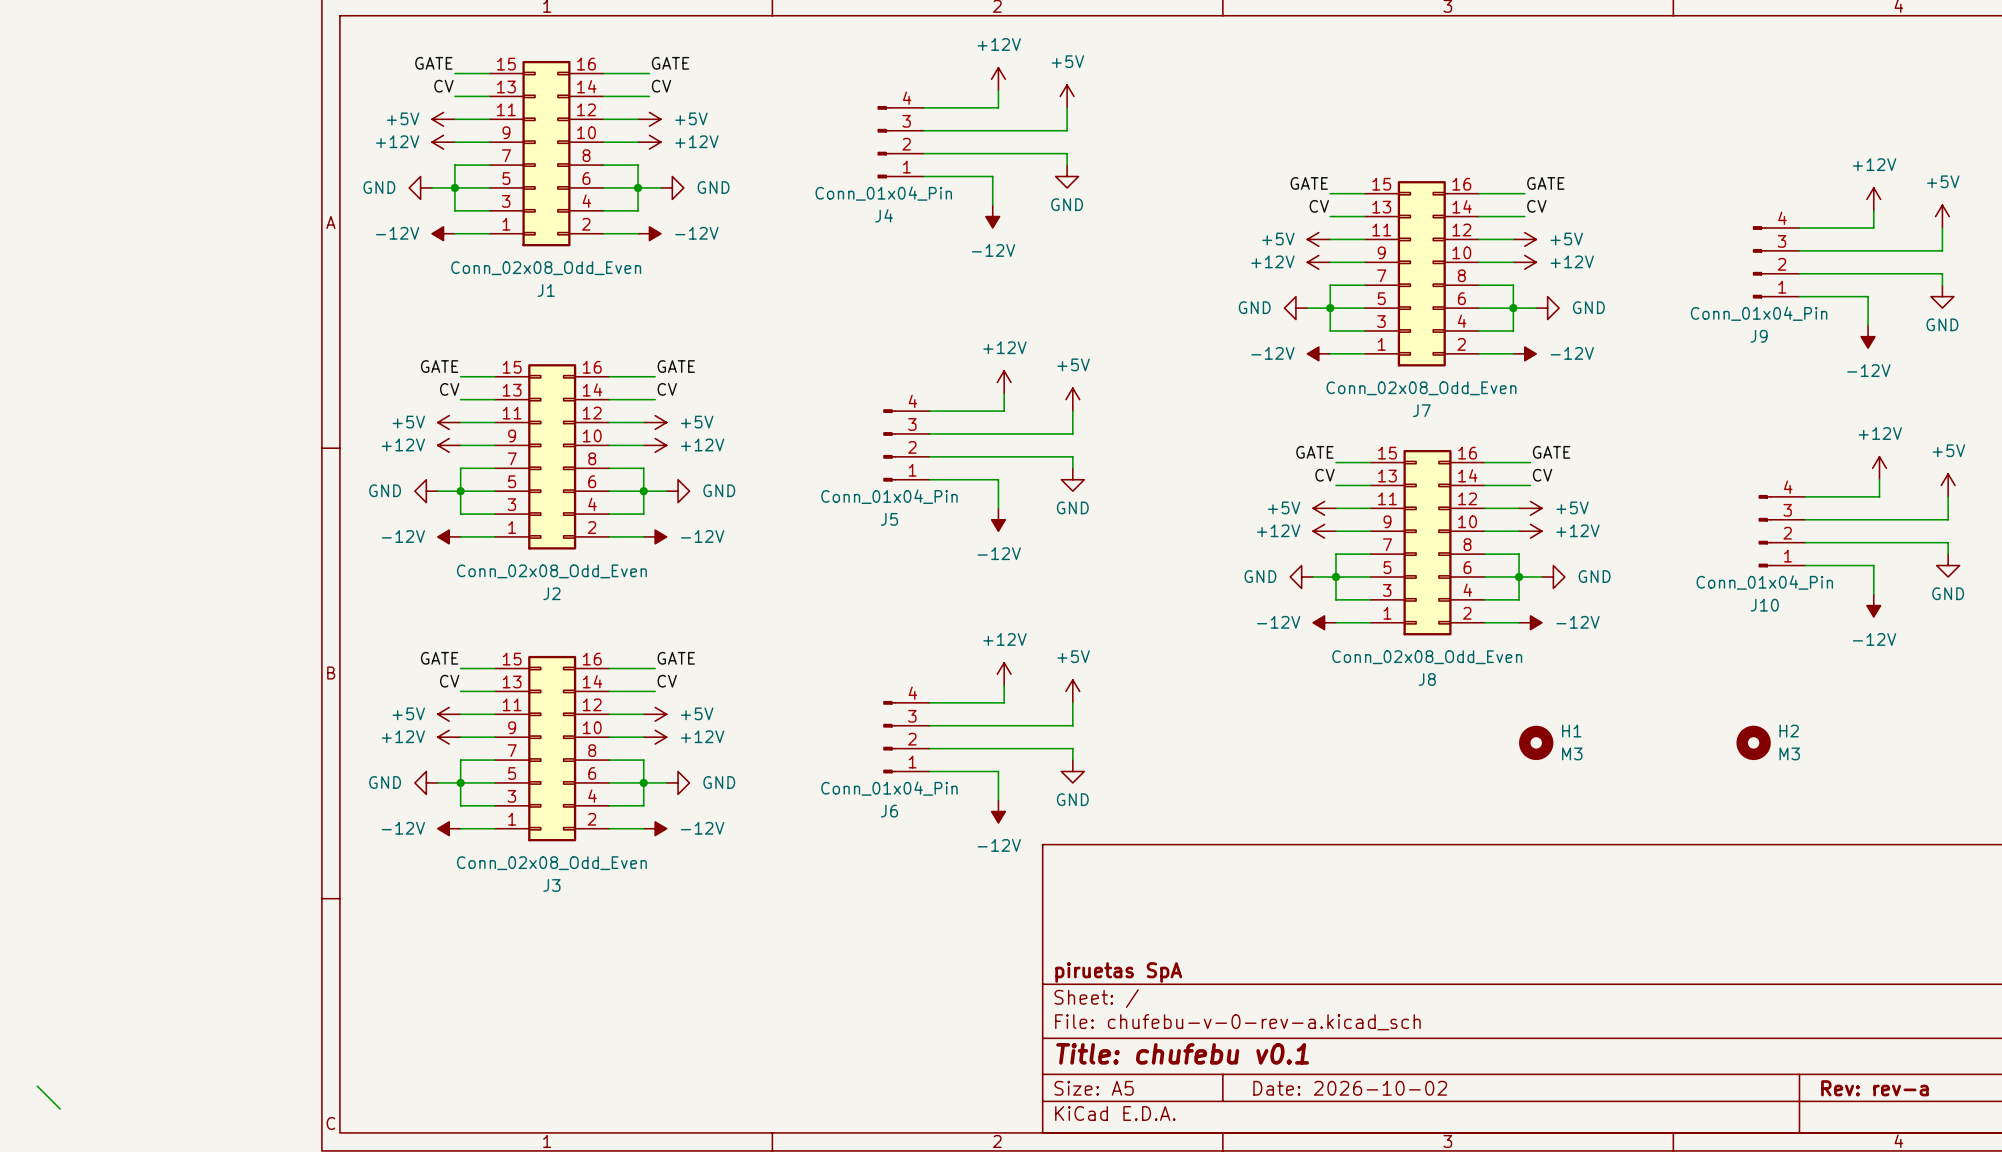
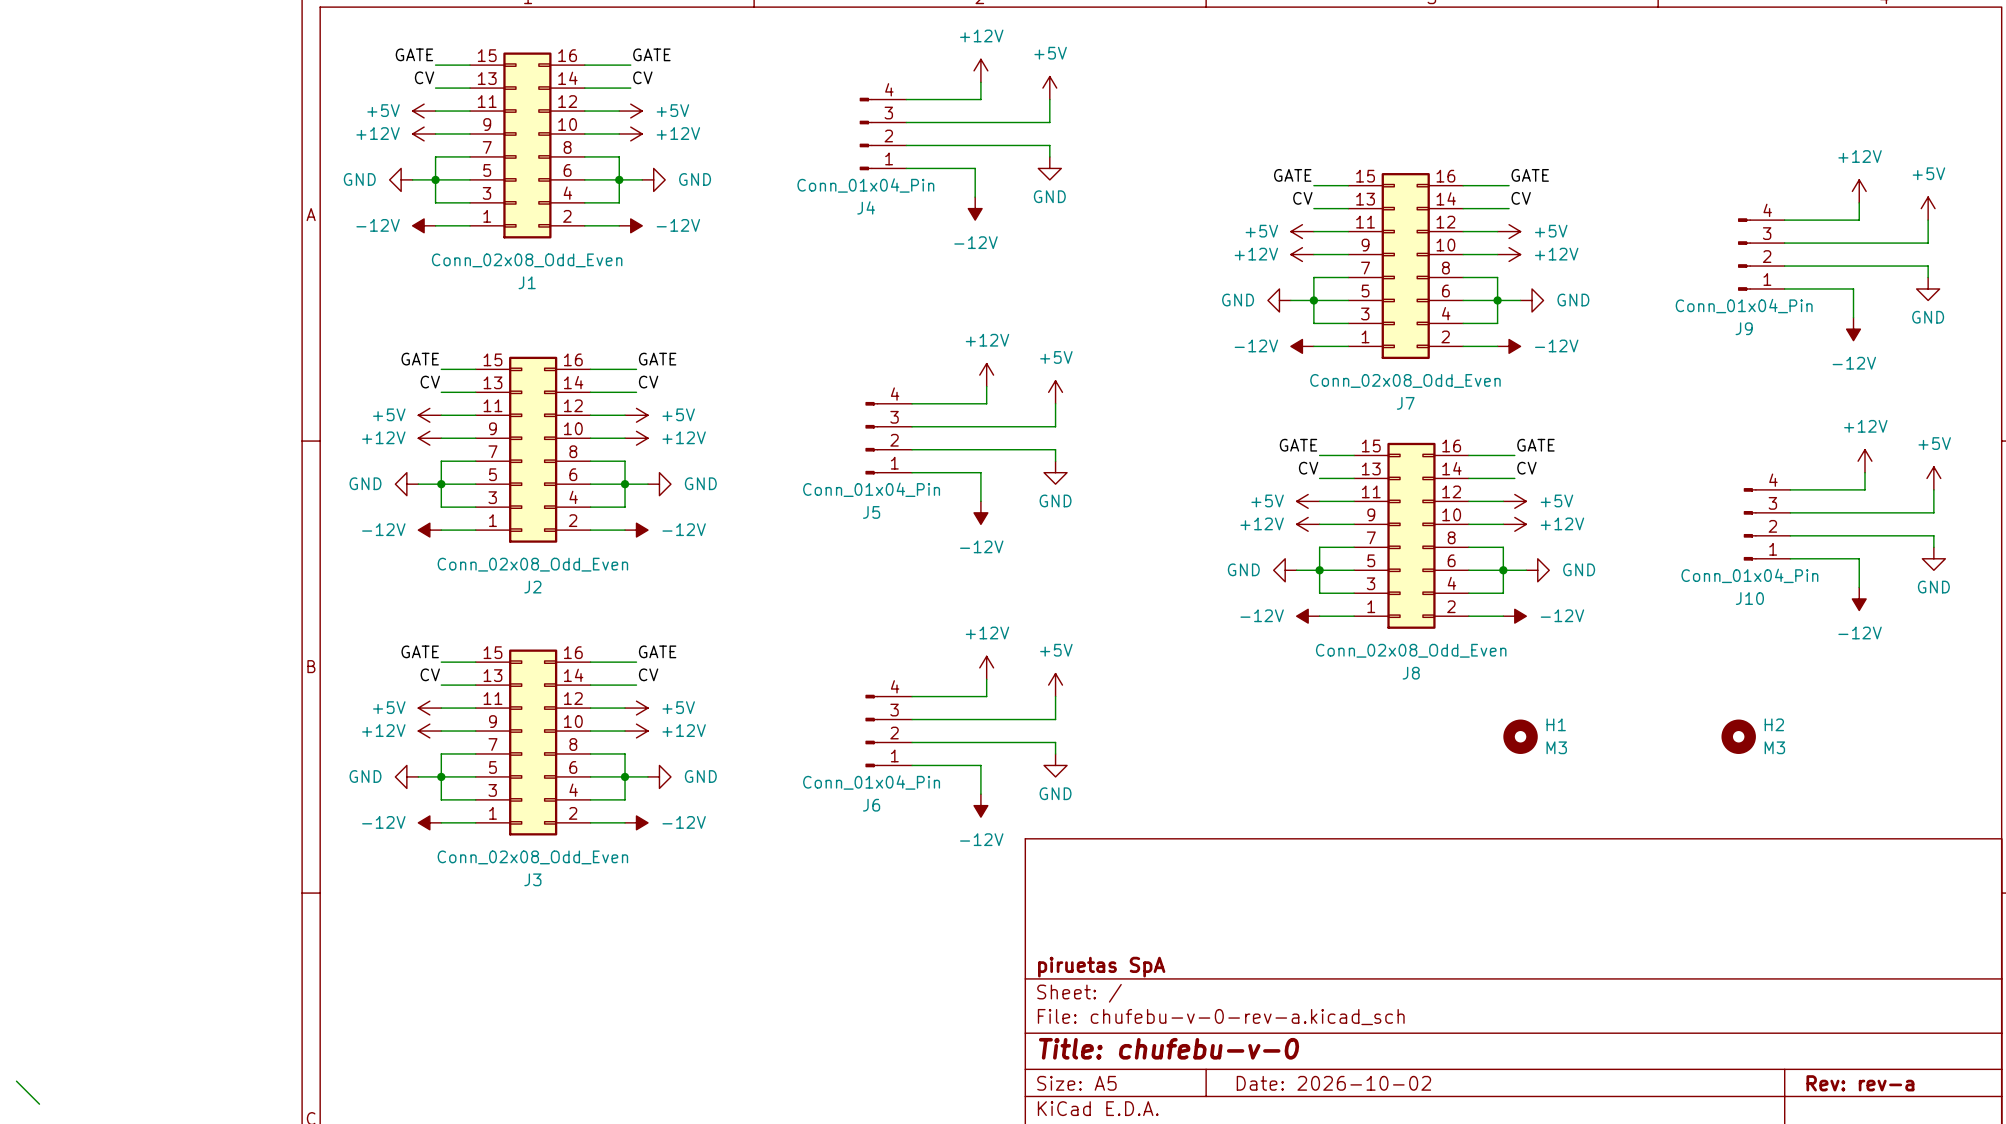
title block: Title: chufebu v0.1 (1182, 1053) -> Title: chufebu-v-0 (1169, 1048)

